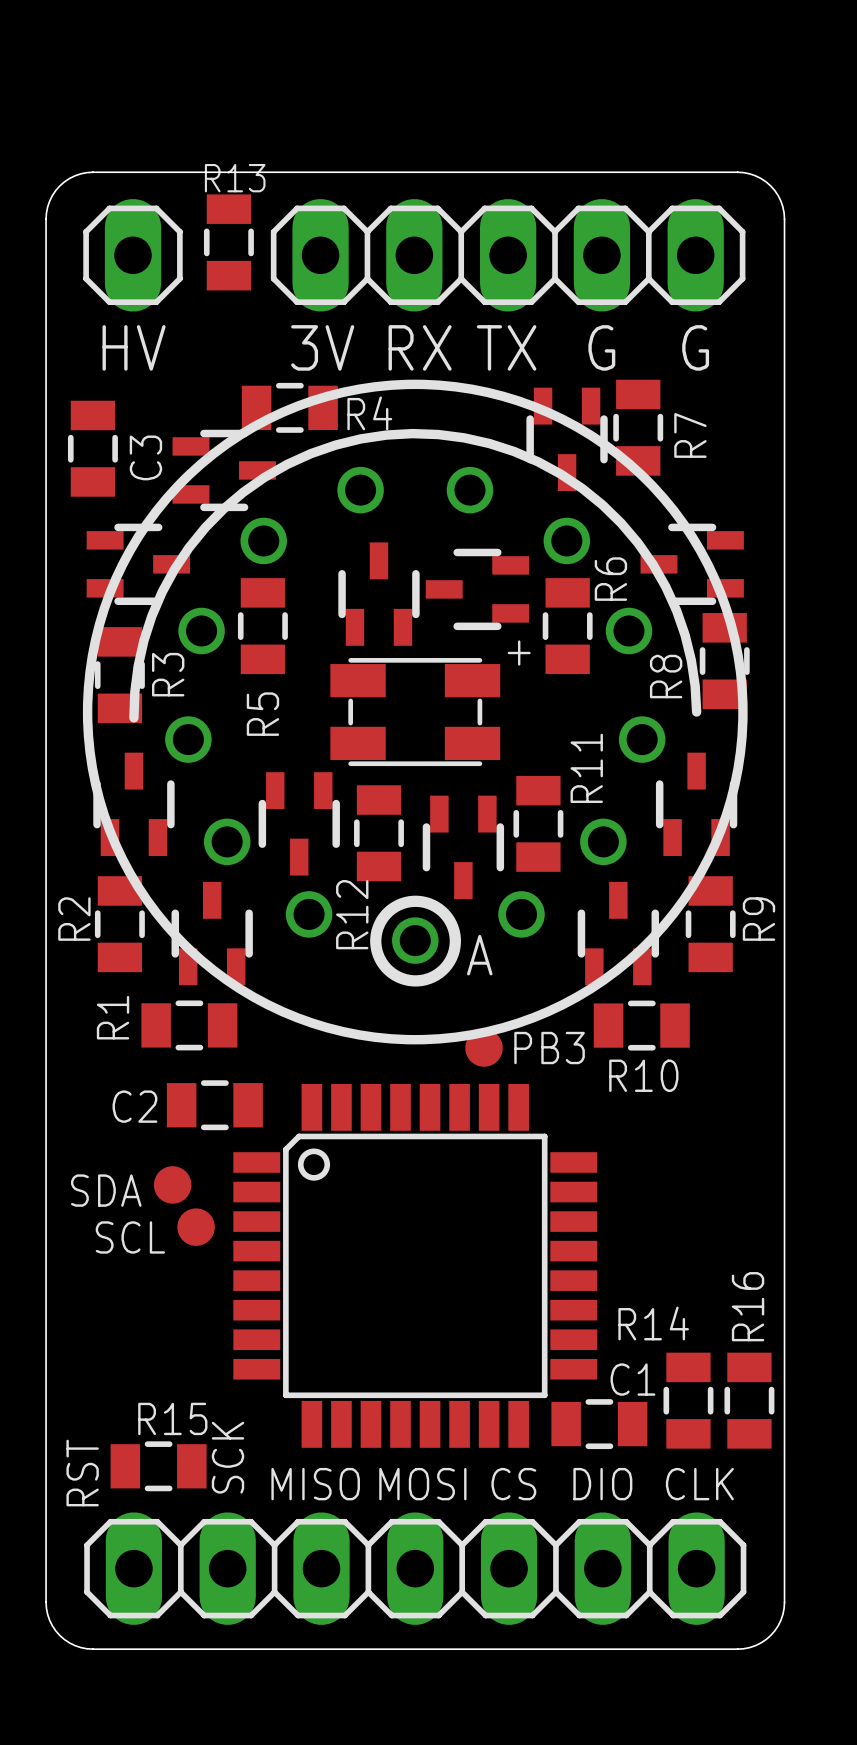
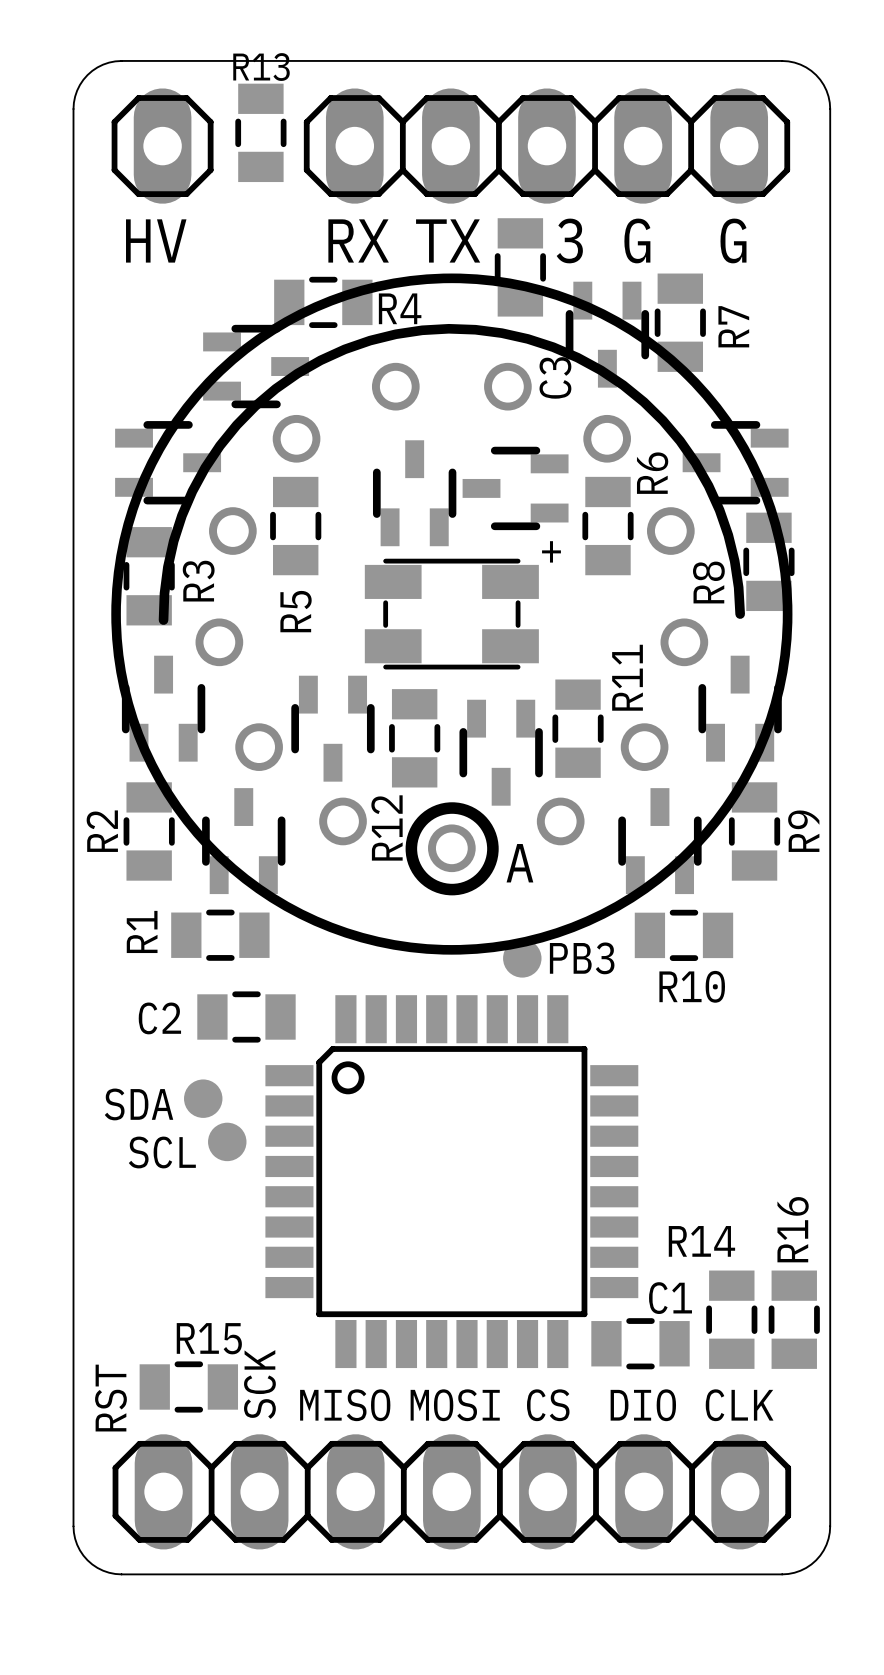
text: 3V (322, 347) -> RX (358, 240)
text: RX (420, 347) -> TX (448, 240)
text: TX (506, 347) -> none
text: none -> 3 (569, 240)
C3 position: (92, 448) -> (520, 267)
C3 name position: C3 (145, 457) -> C3 (555, 377)

